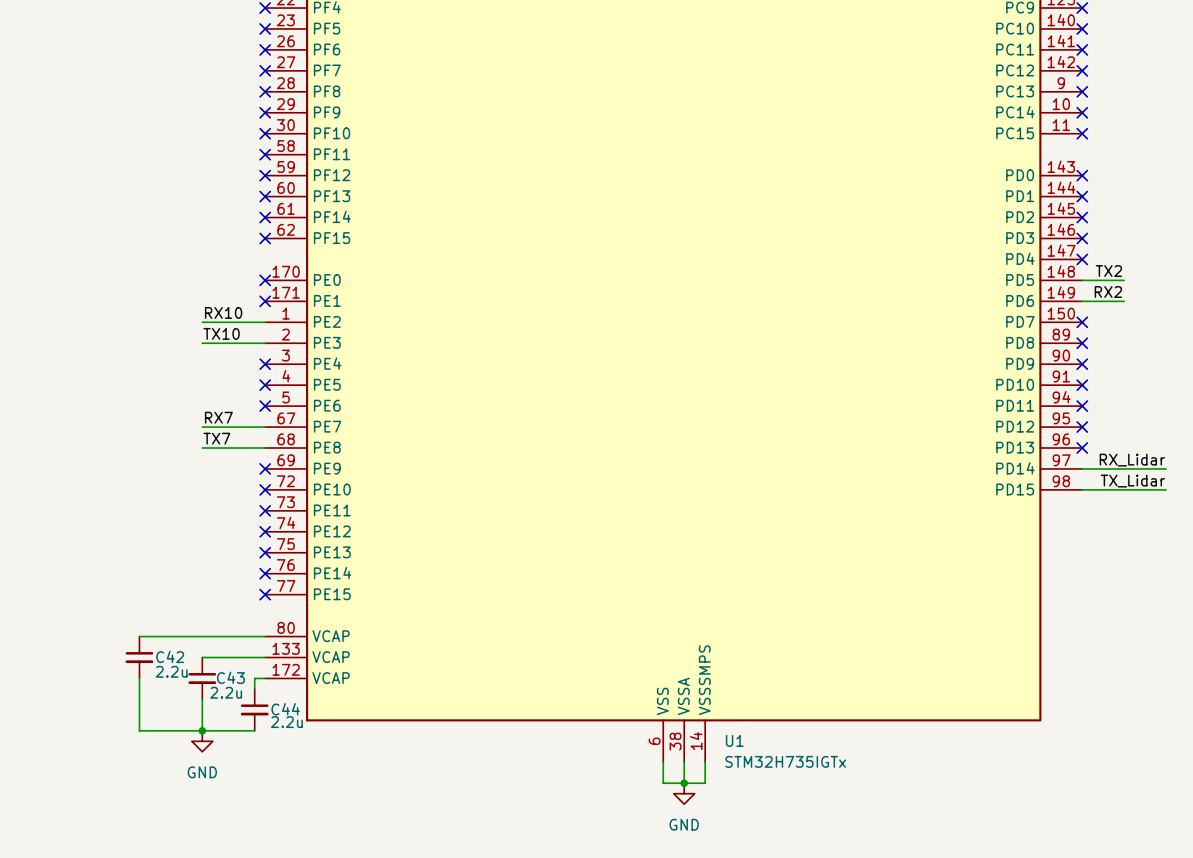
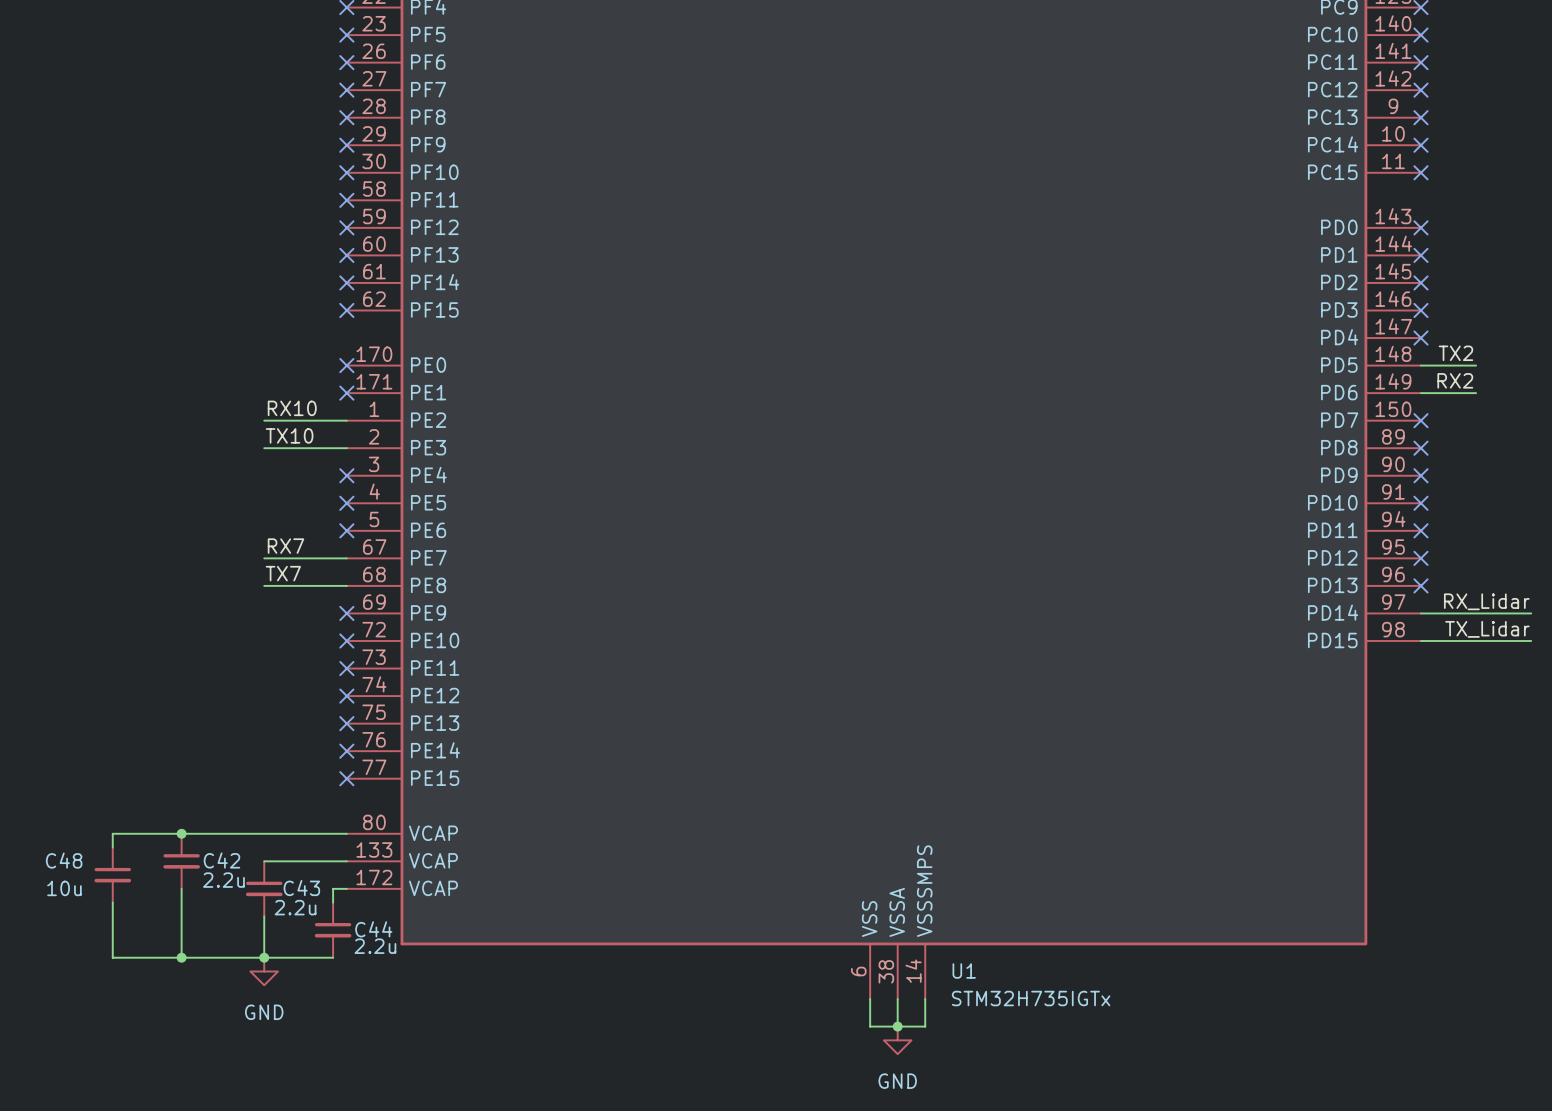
wire: none -> (181, 833) (112, 833) (112, 847)
junction: none -> (181, 833)
C48: none -> 10u (112, 875)
wire: none -> (112, 902) (112, 957) (181, 957)
junction: none -> (181, 957)

